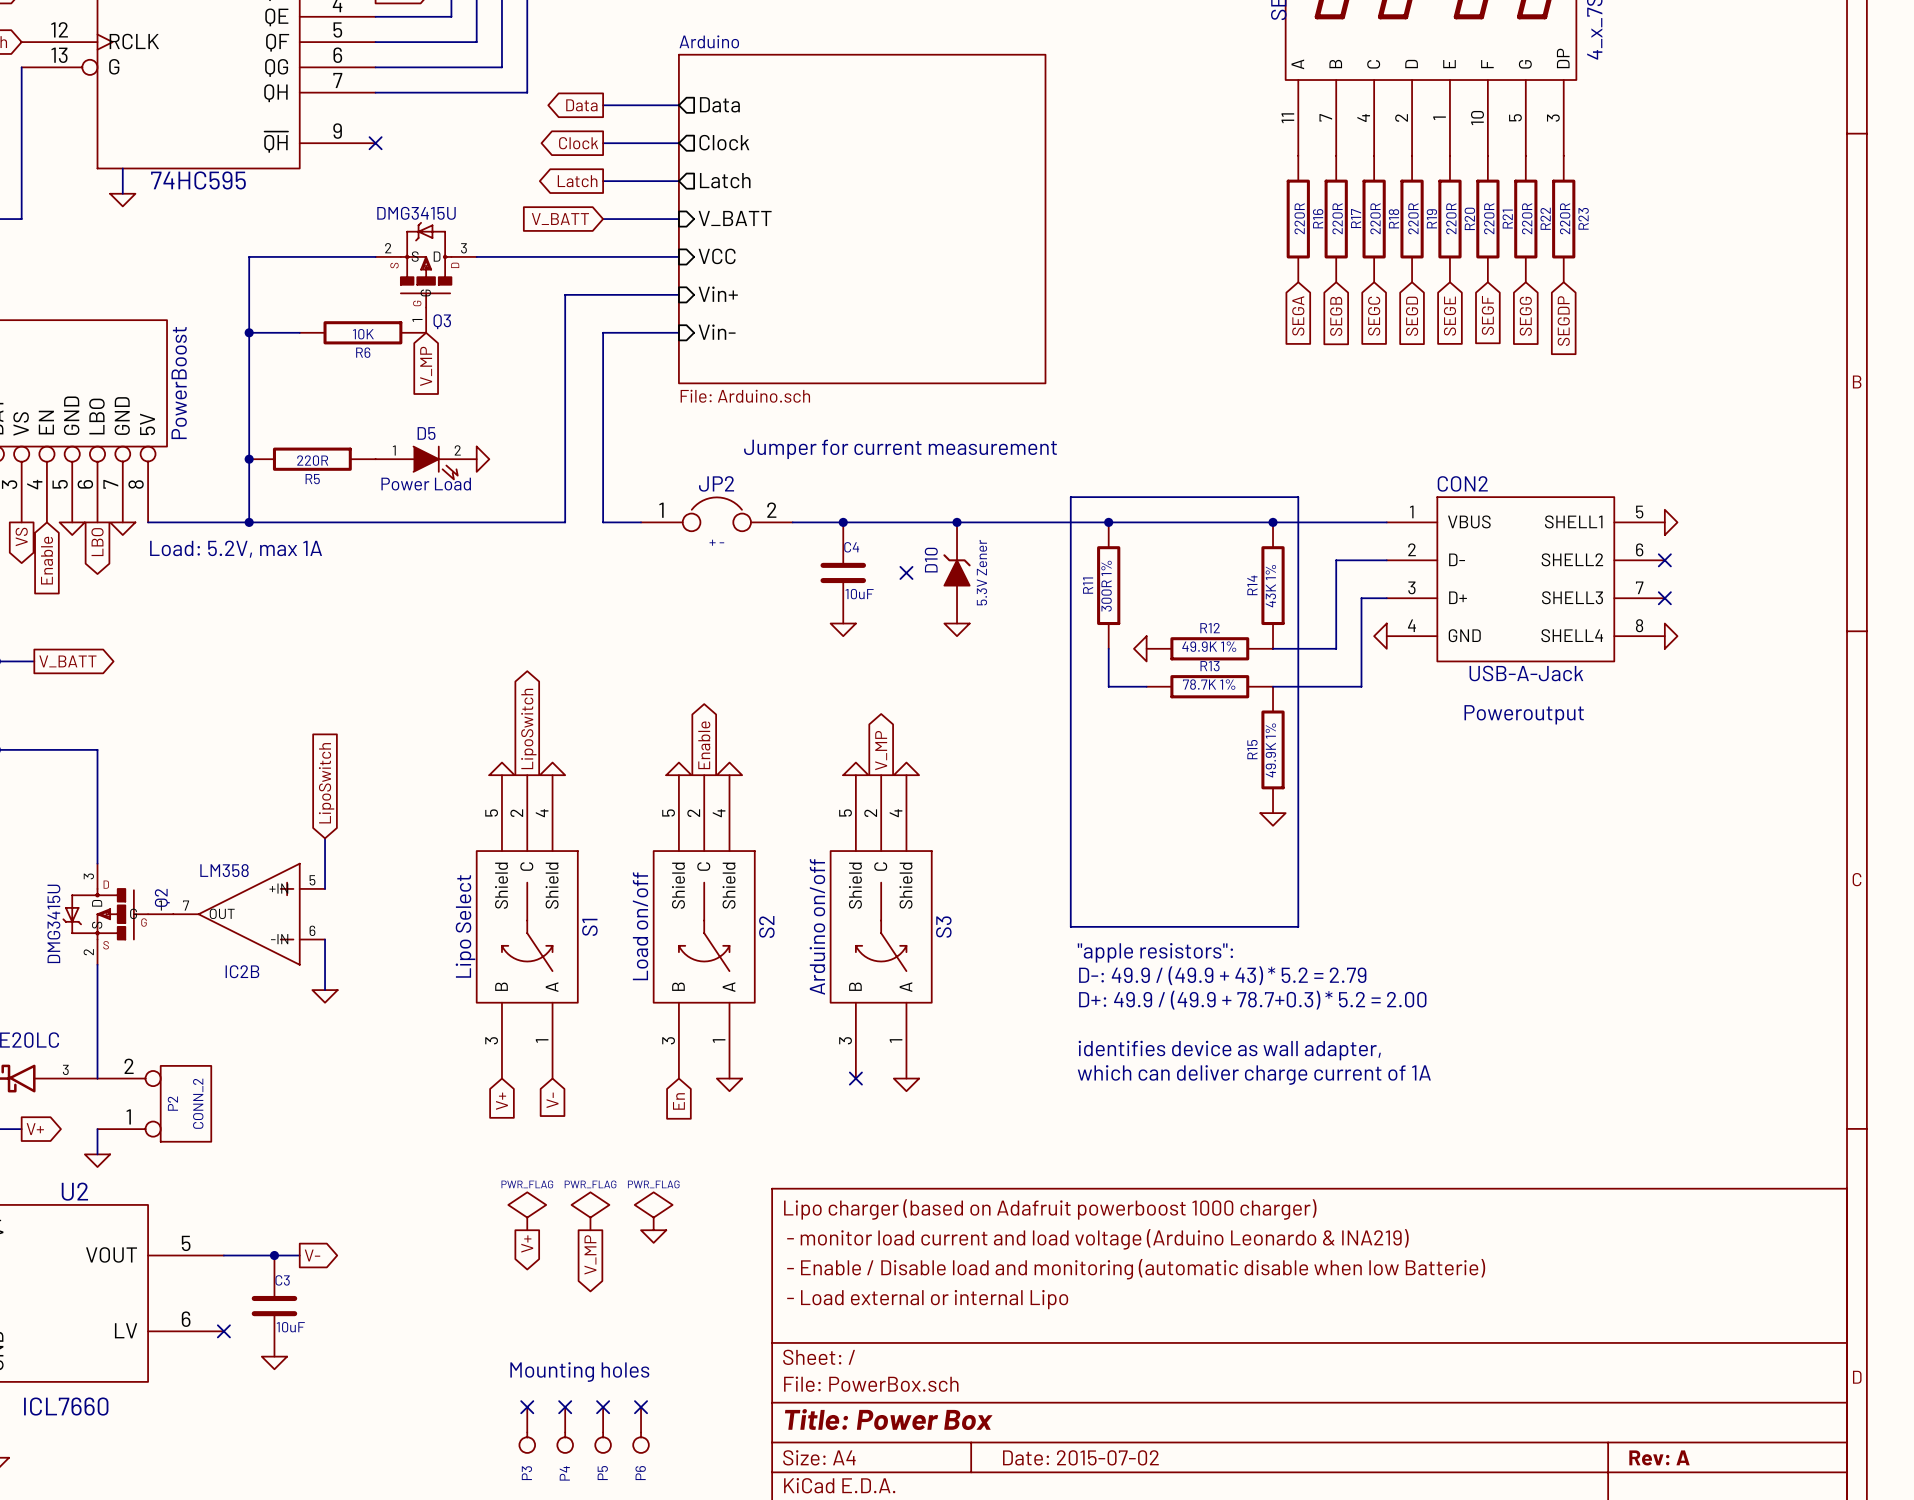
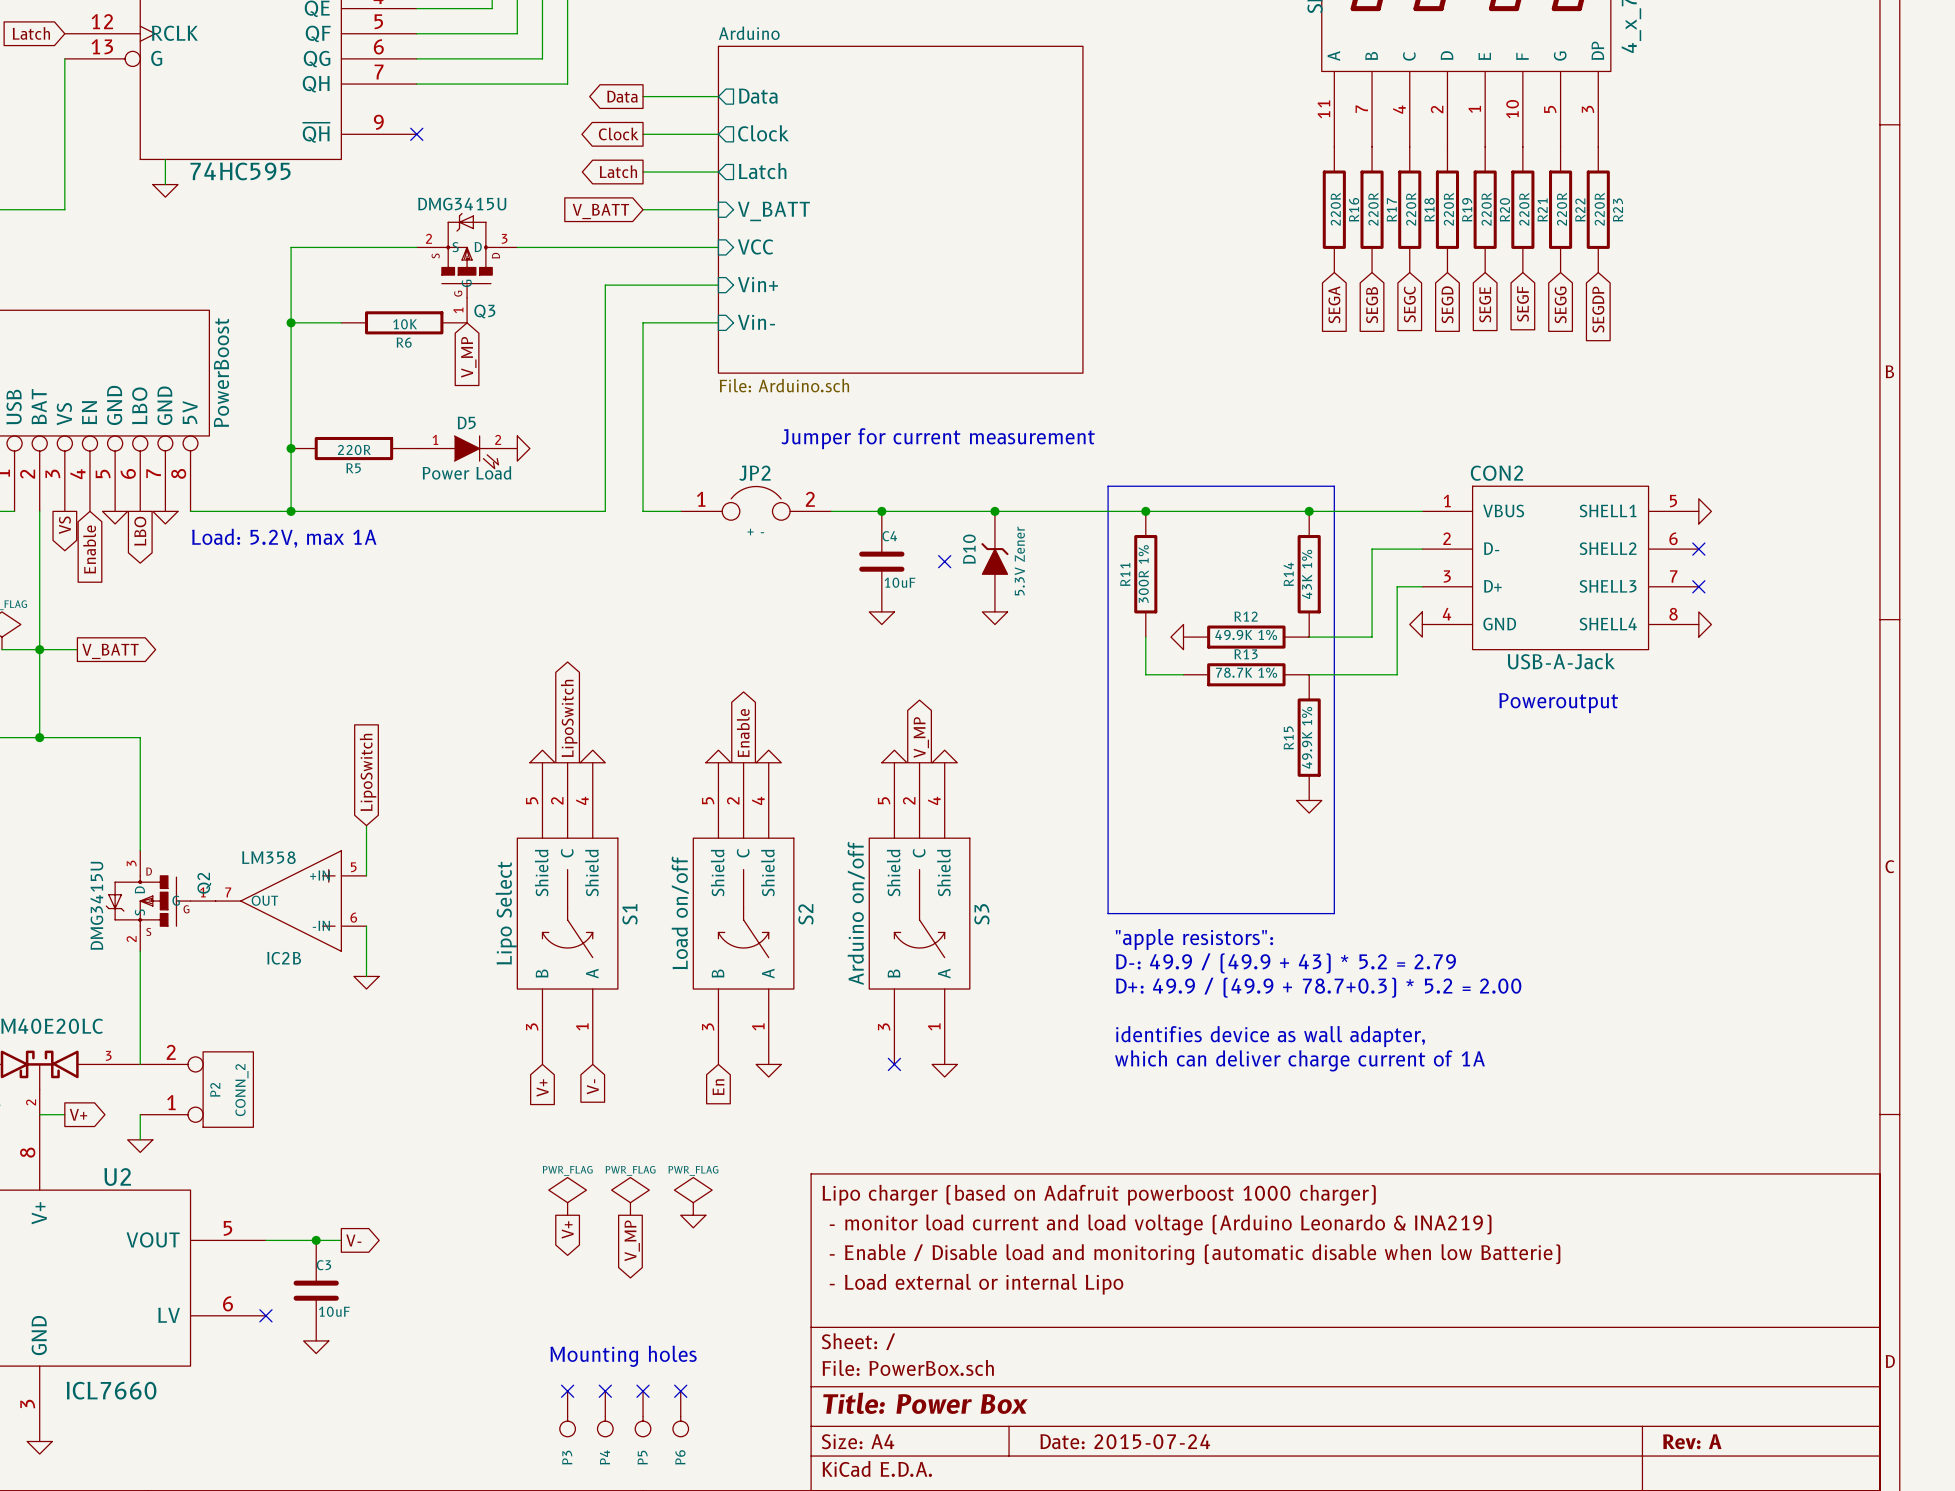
title block: Date: 2015-07-02 (1080, 1457) -> Date: 2015-07-24 (1125, 1441)

